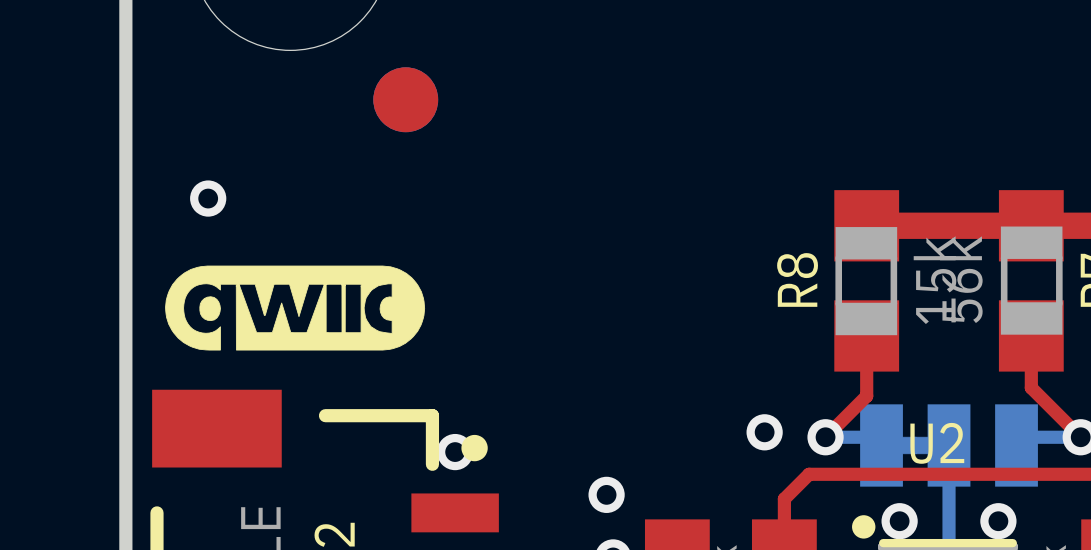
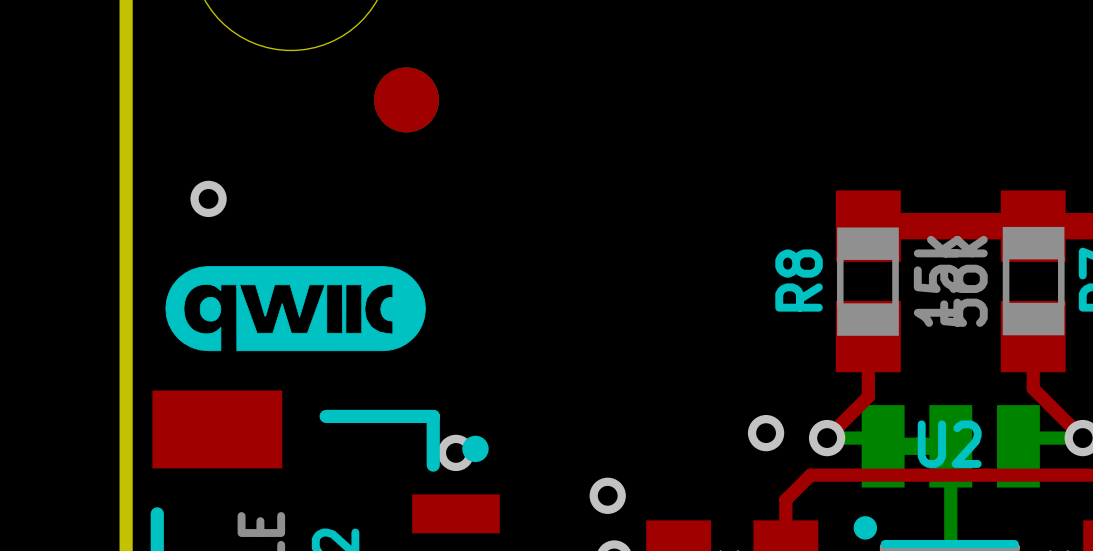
via: (899, 521) -> none
via: (998, 521) -> none

